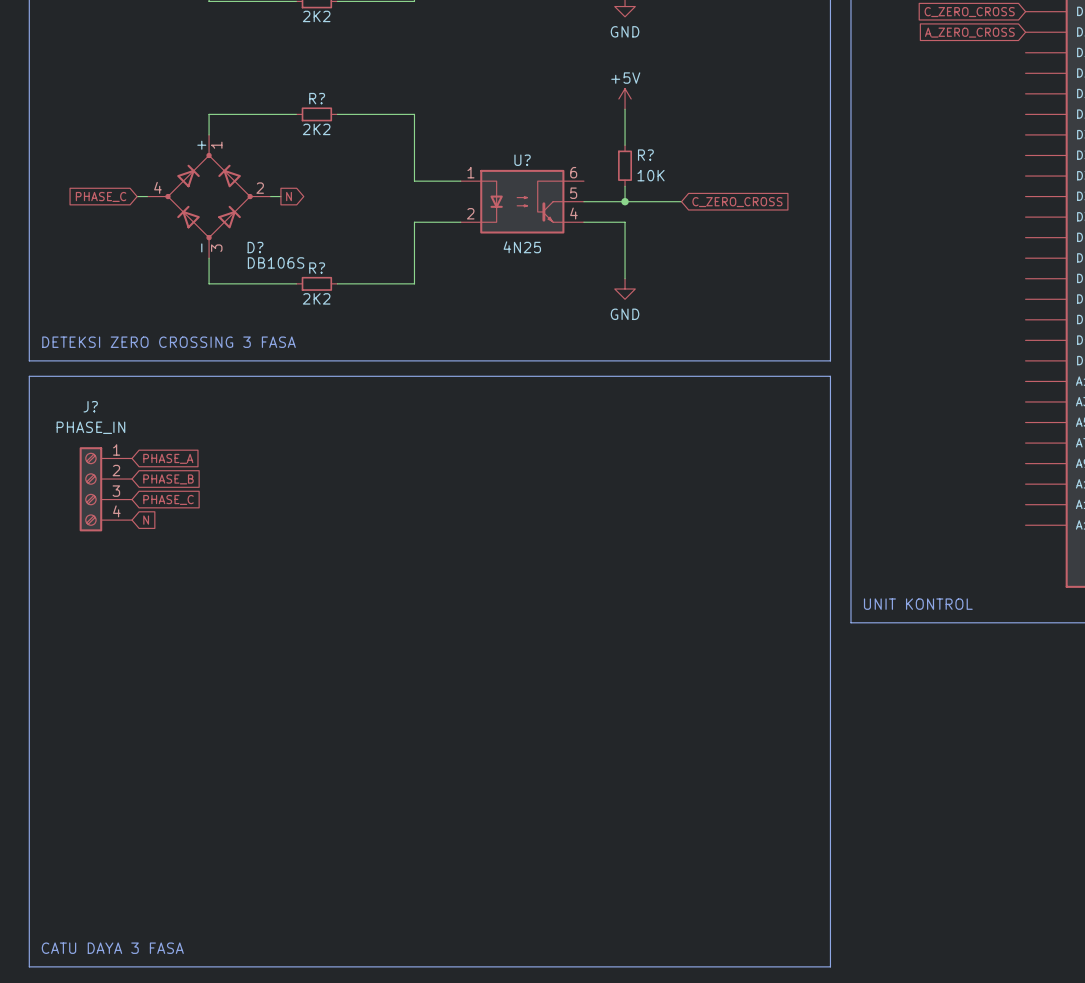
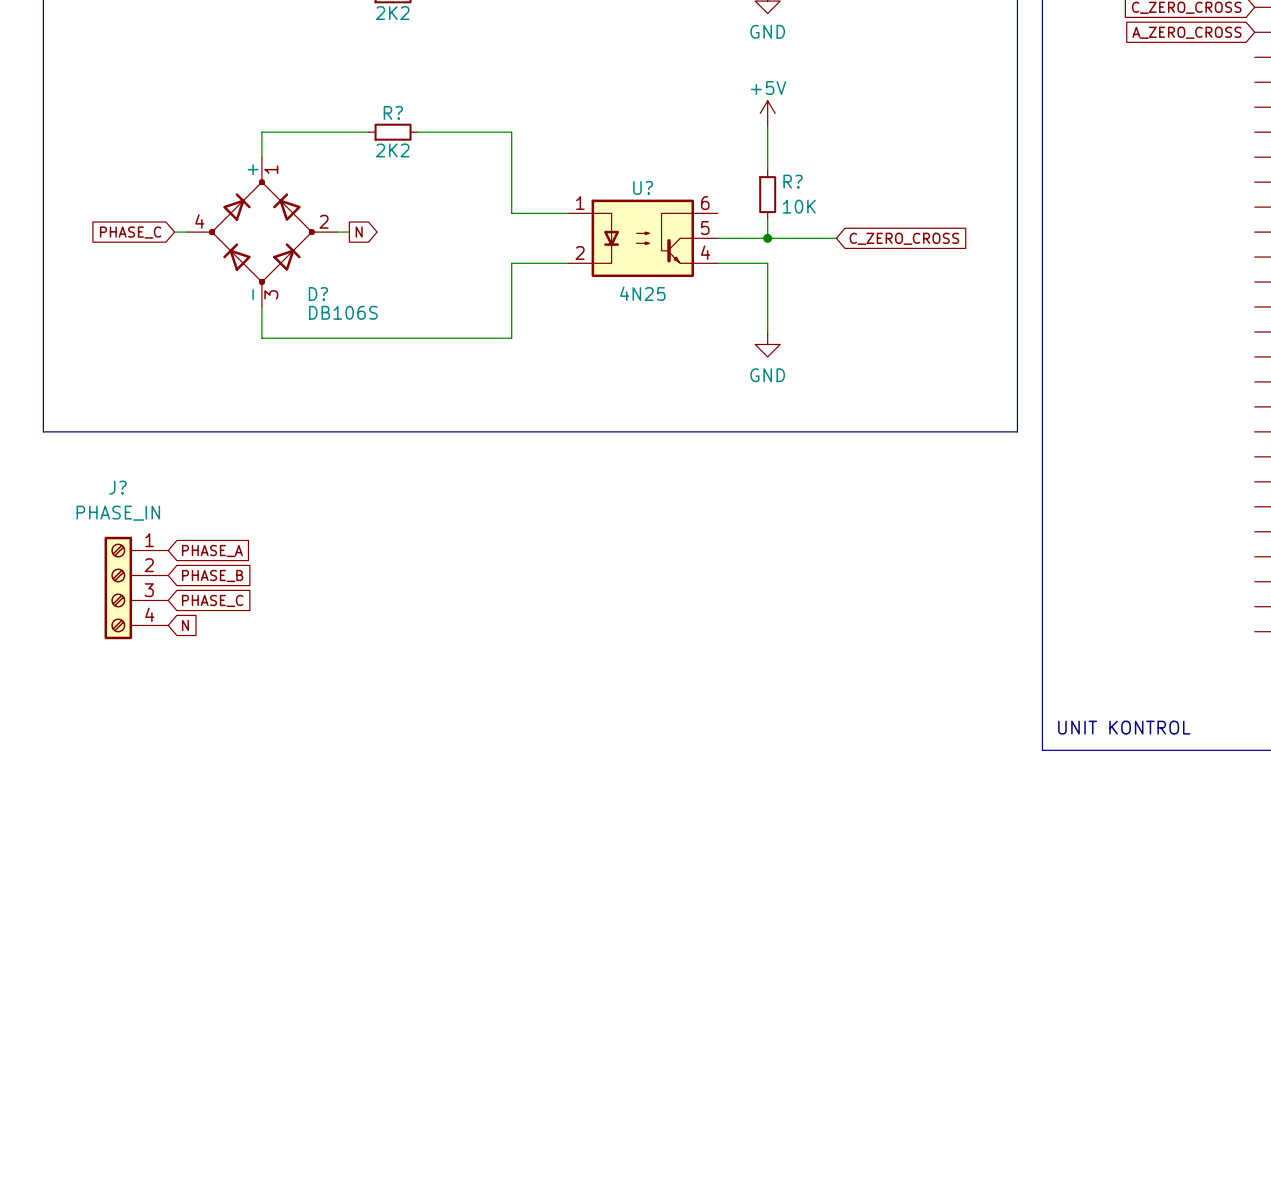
wire: none -> (368, 338) (418, 338)
R?: 2K2 (316, 283) -> none
text: DETEKSI ZERO CROSSING 3 FASA (169, 342) -> none
line: (29, 376) (830, 376) (830, 966) (29, 966) (29, 376) -> none
text: CATU DAYA 3 FASA (112, 948) -> none

